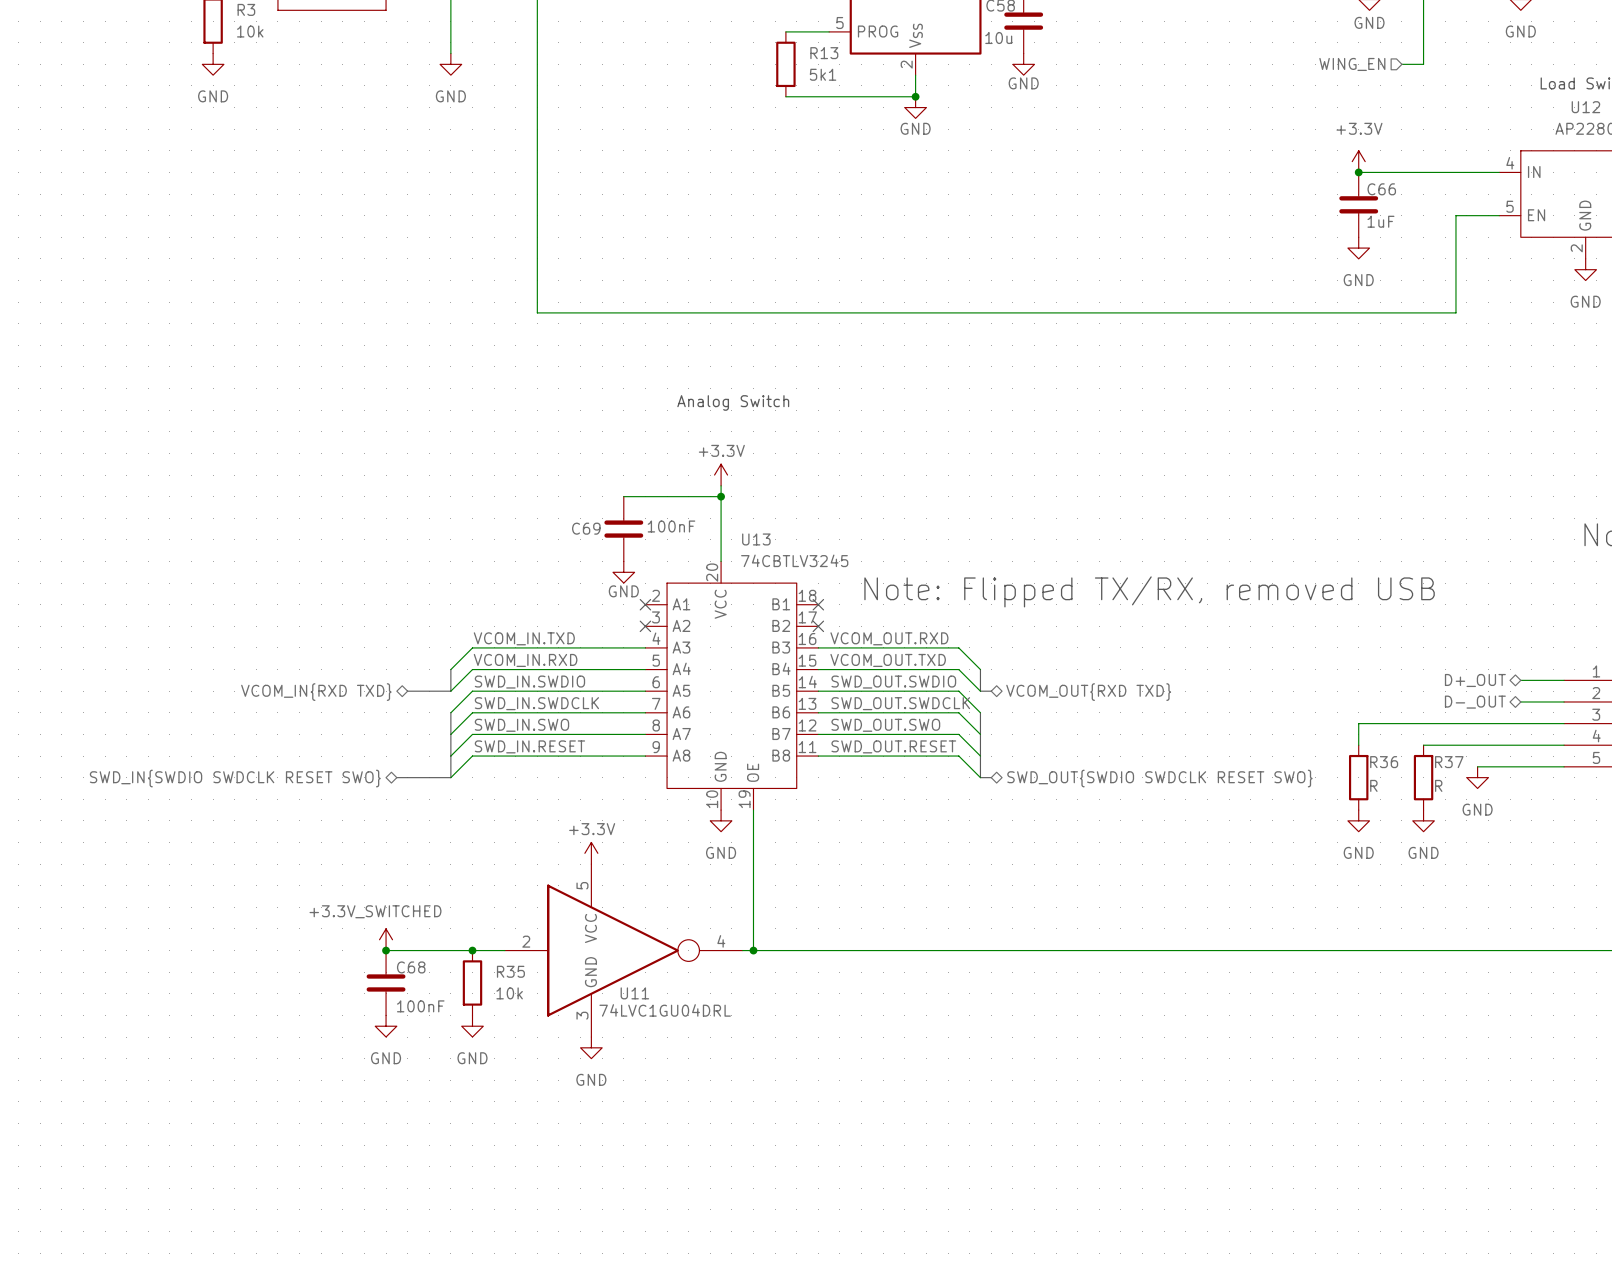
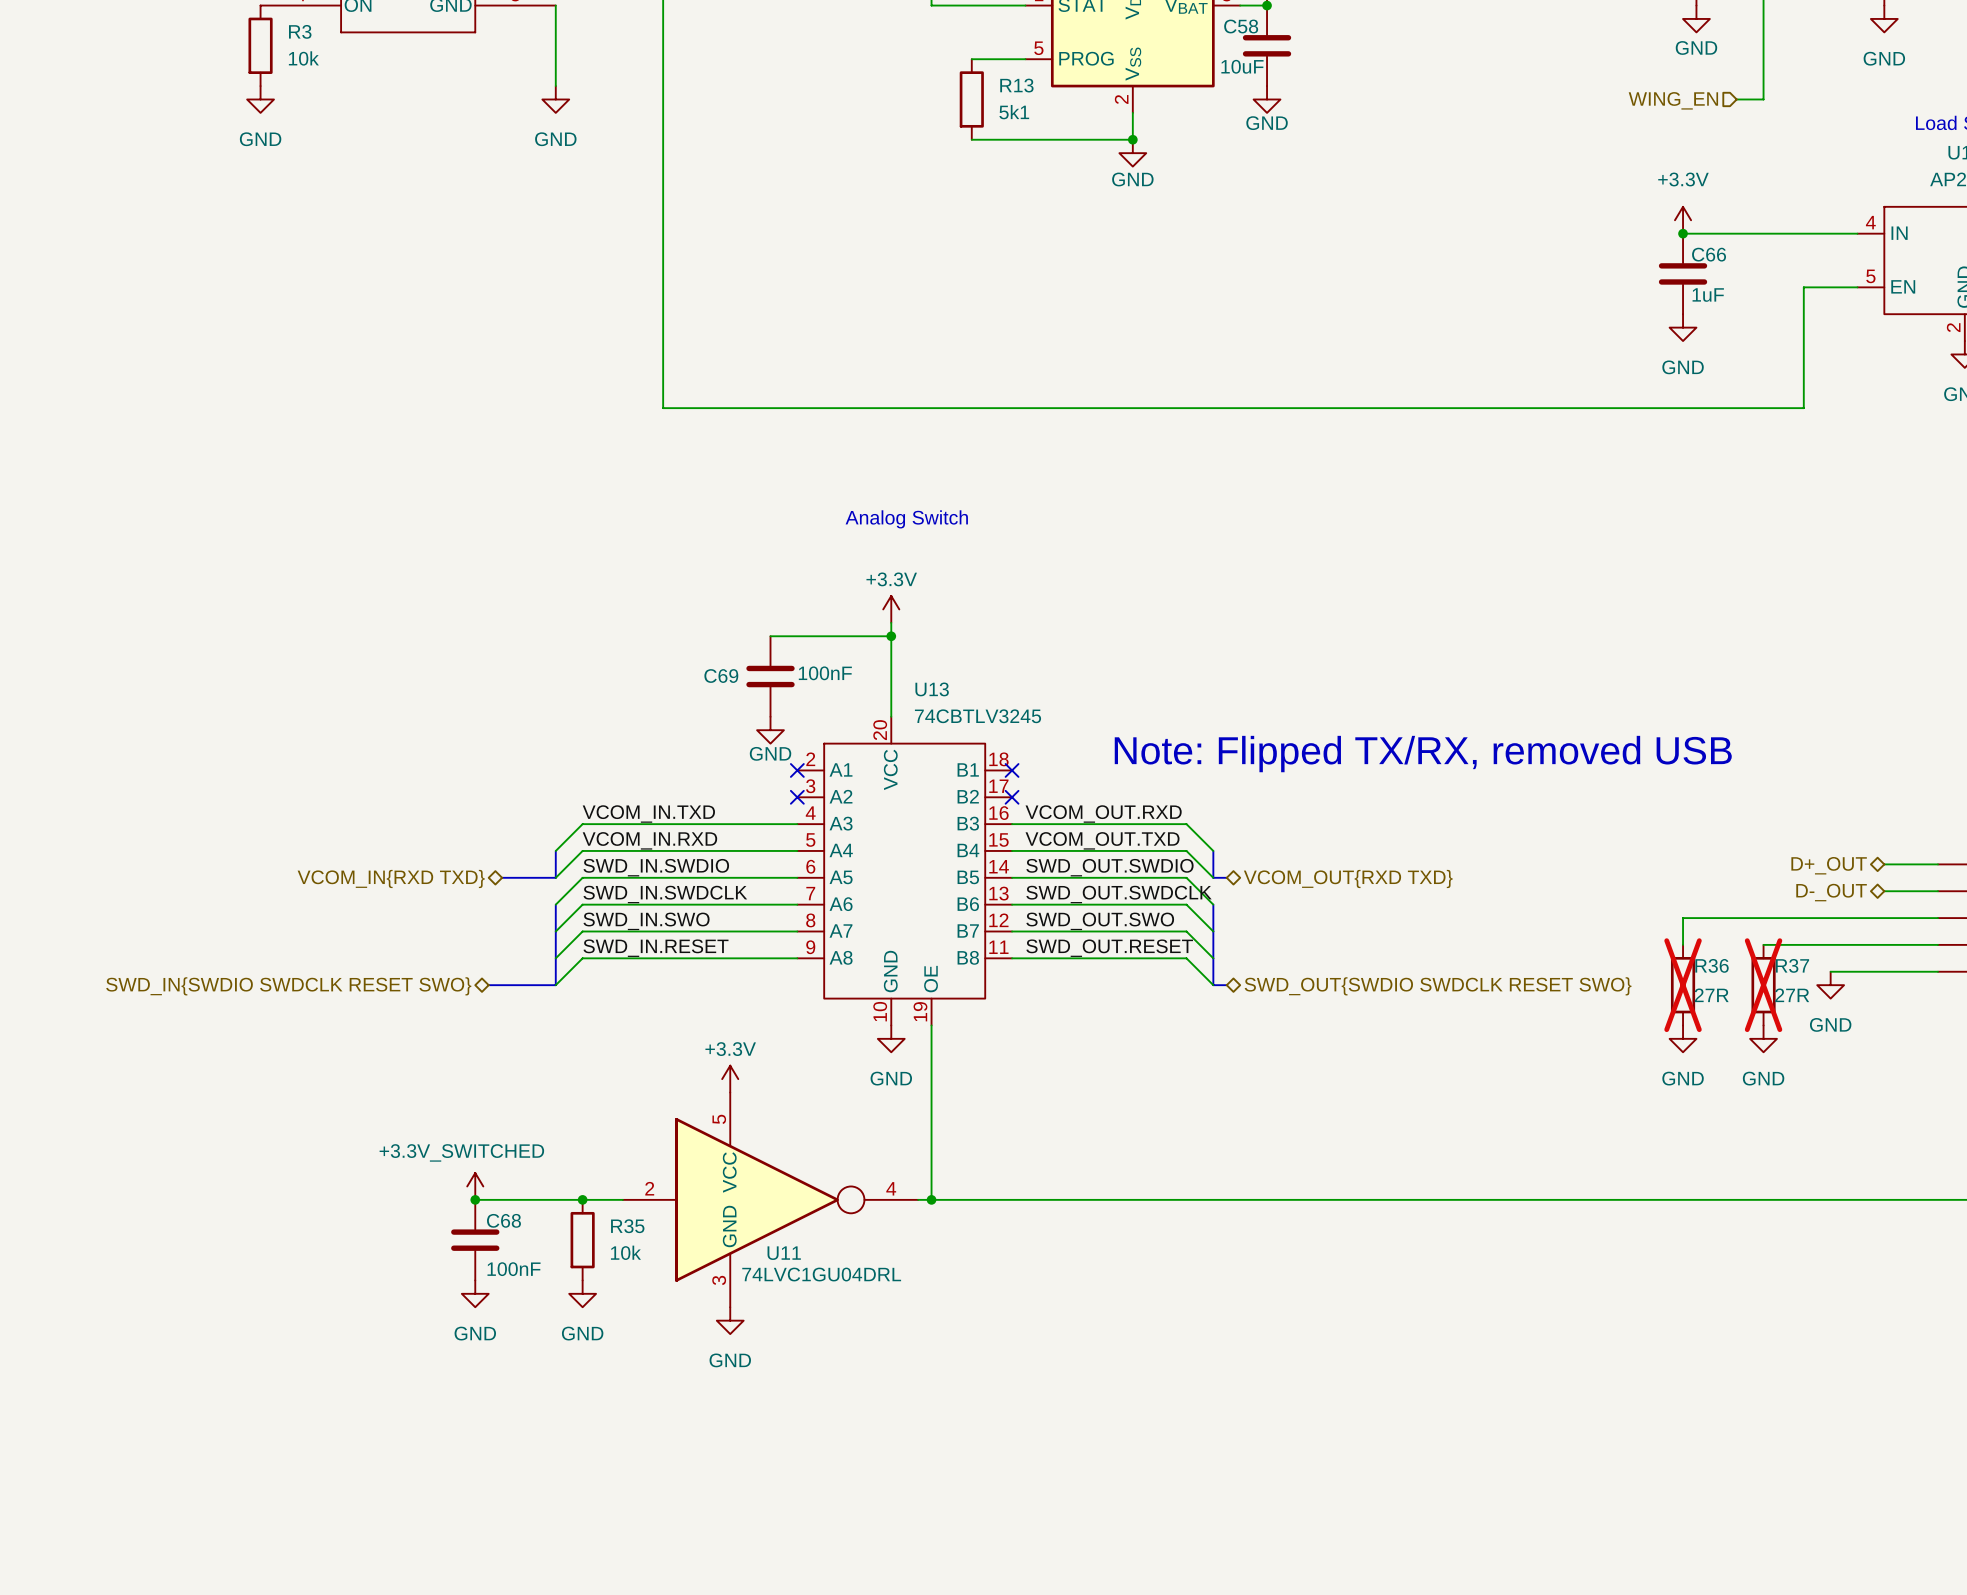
C58 value: 10u (998, 38) -> 10uF (1242, 66)
R36 do-not-place cross: none -> (1683, 985)
R37 do-not-place cross: none -> (1763, 985)
R36 value: R (1373, 785) -> 27R (1711, 995)
R37 value: R (1438, 785) -> 27R (1792, 995)

